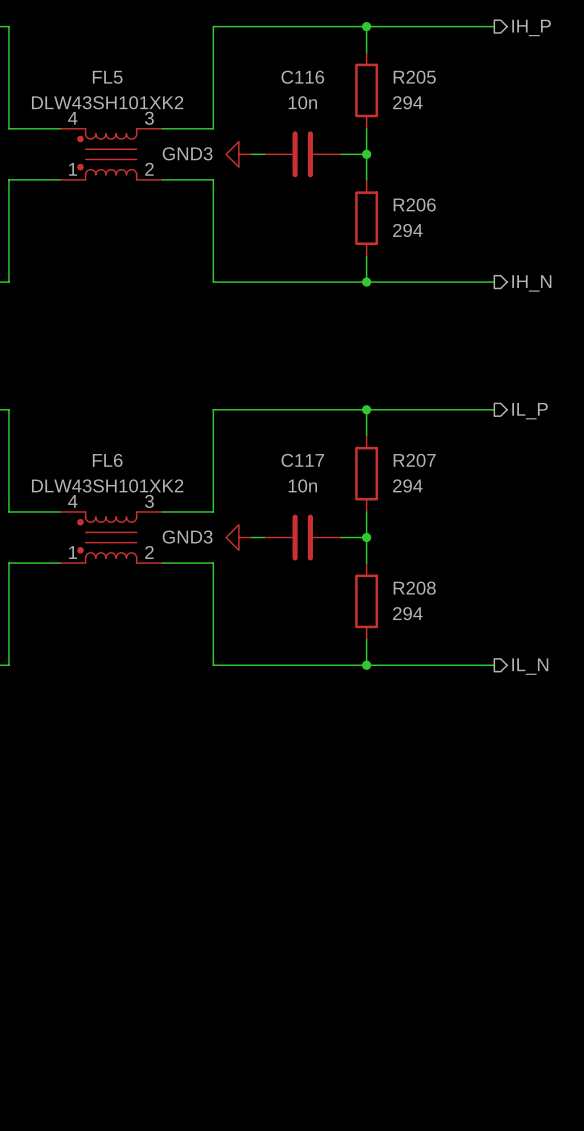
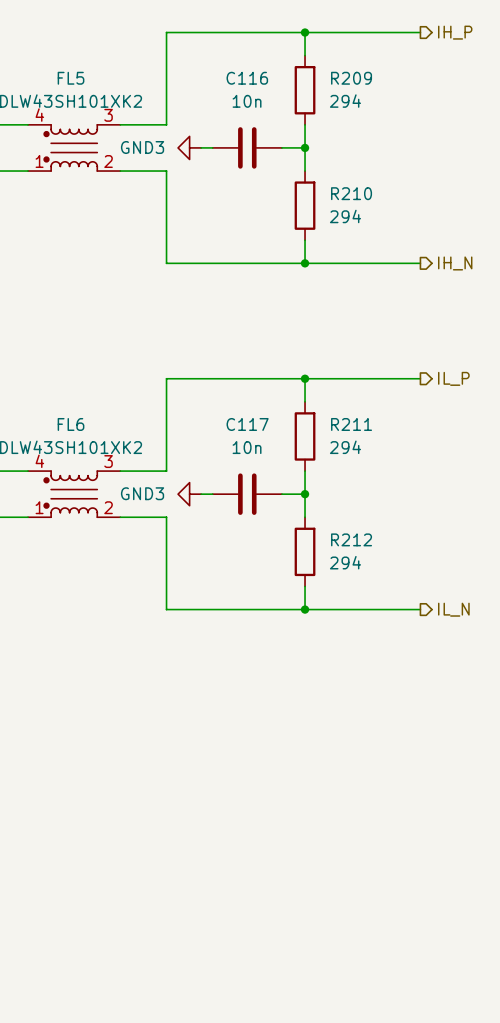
R205 name: R205 (414, 77) -> R209 (351, 78)
R206 name: R206 (414, 204) -> R210 (351, 193)
R207 name: R207 (414, 460) -> R211 (351, 424)
R208 name: R208 (414, 588) -> R212 (351, 539)

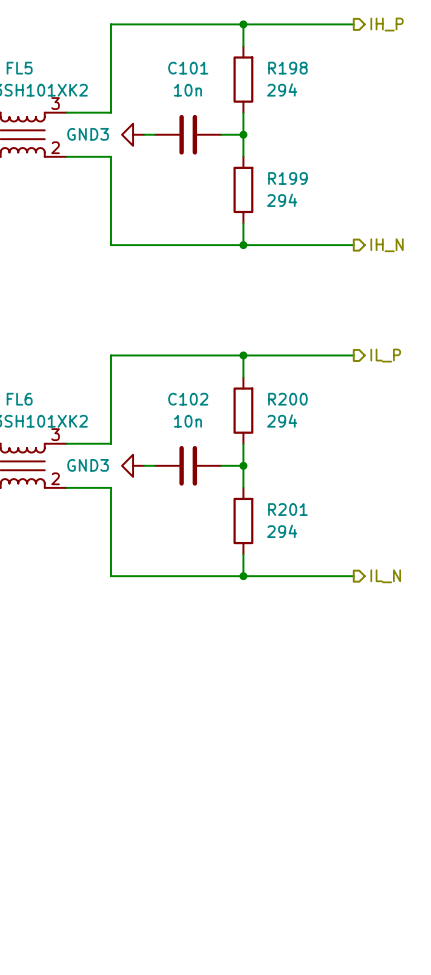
C116 name: C116 (247, 78) -> C101 (188, 68)
R209 name: R209 (351, 78) -> R198 (287, 68)
R210 name: R210 (351, 193) -> R199 (287, 178)
C117 name: C117 (247, 424) -> C102 (188, 399)
R211 name: R211 (351, 424) -> R200 (287, 399)
R212 name: R212 (351, 539) -> R201 (287, 509)

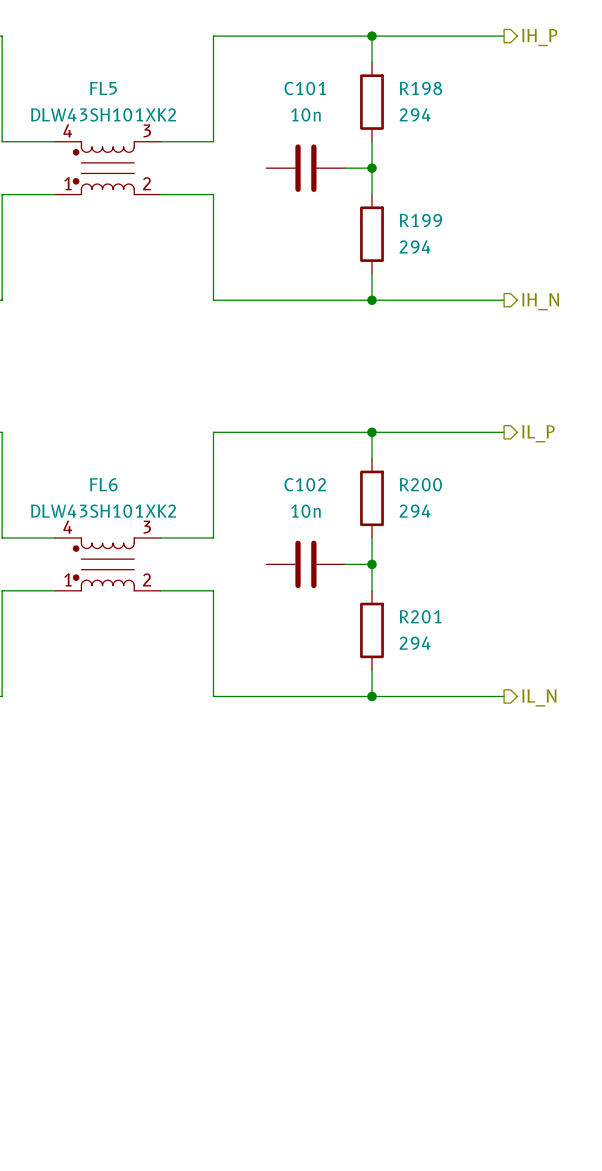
power symbol: GND3 (133, 134) -> none
wire: (144, 134) (155, 134) -> none
power symbol: GND3 (133, 465) -> none
wire: (144, 465) (155, 465) -> none

